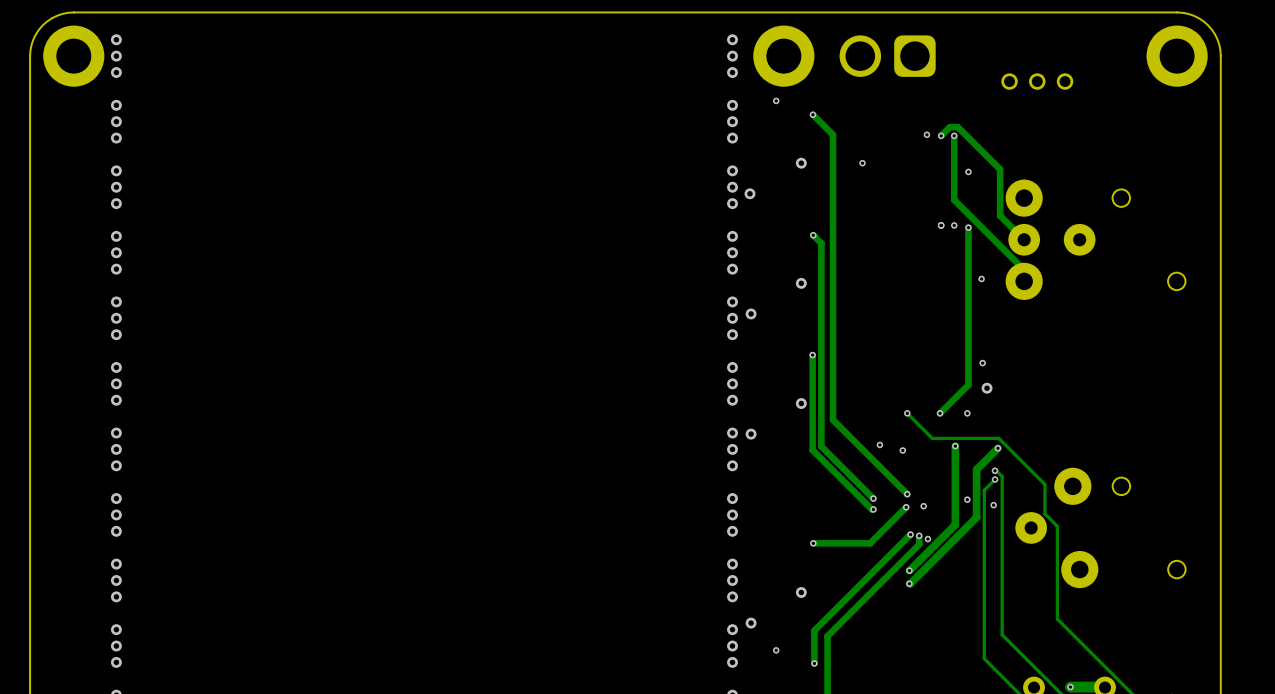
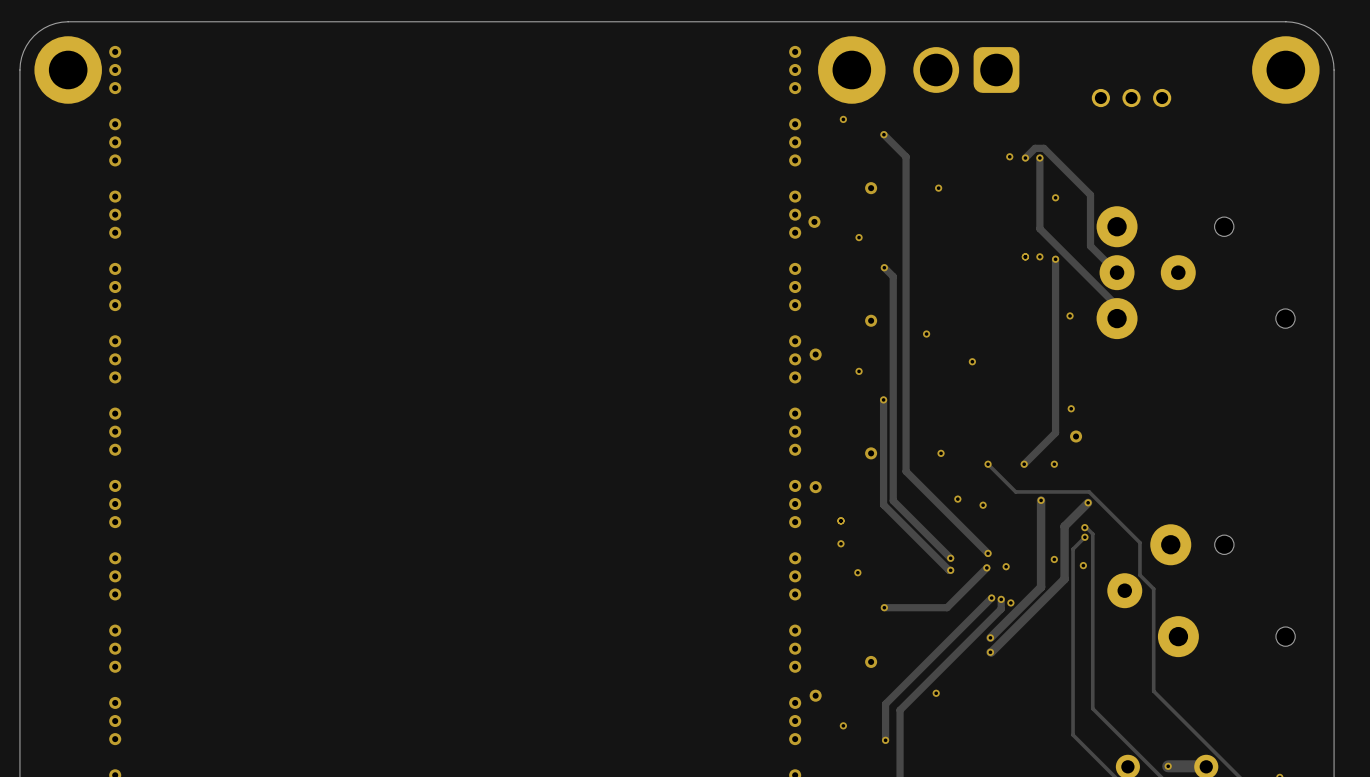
via: none -> (859, 237)
via: none -> (926, 334)
via: none -> (972, 361)
via: none -> (859, 371)
via: none -> (941, 453)
via: none -> (840, 520)
via: none -> (840, 543)
via: none -> (857, 572)
via: none -> (936, 693)

